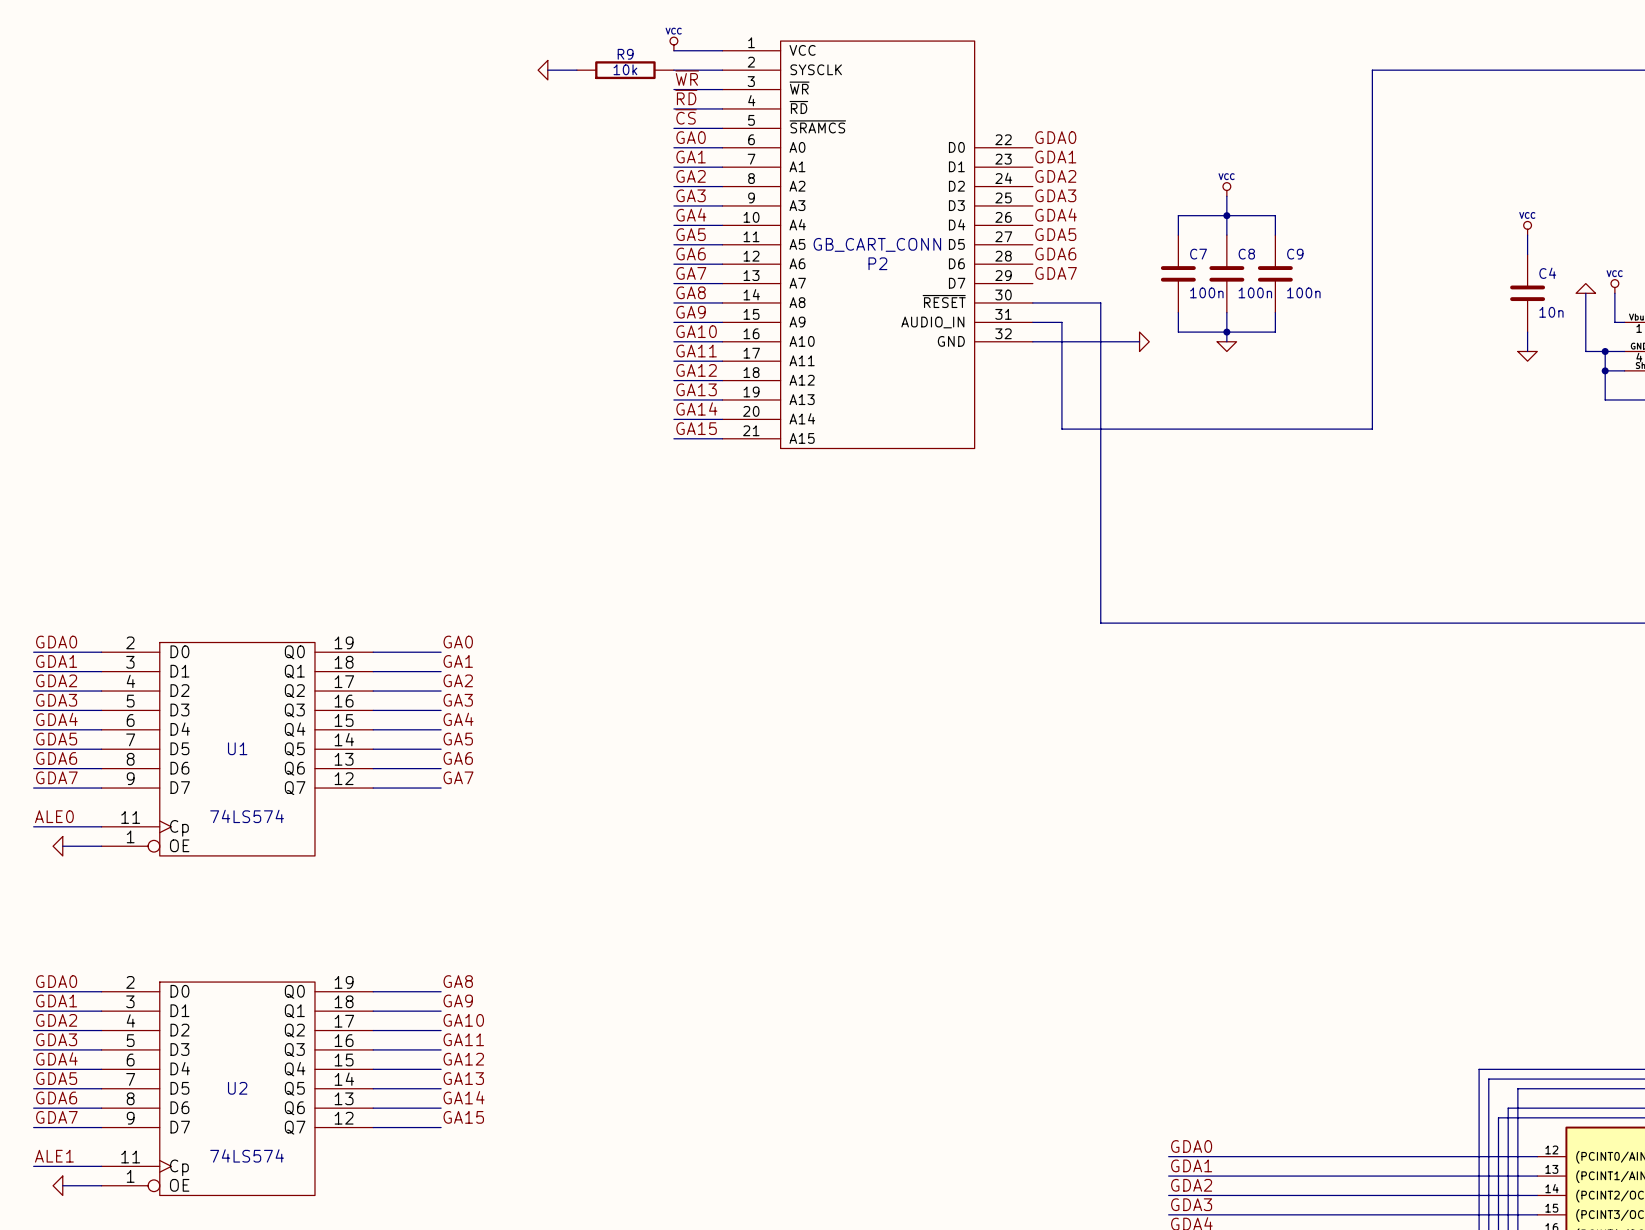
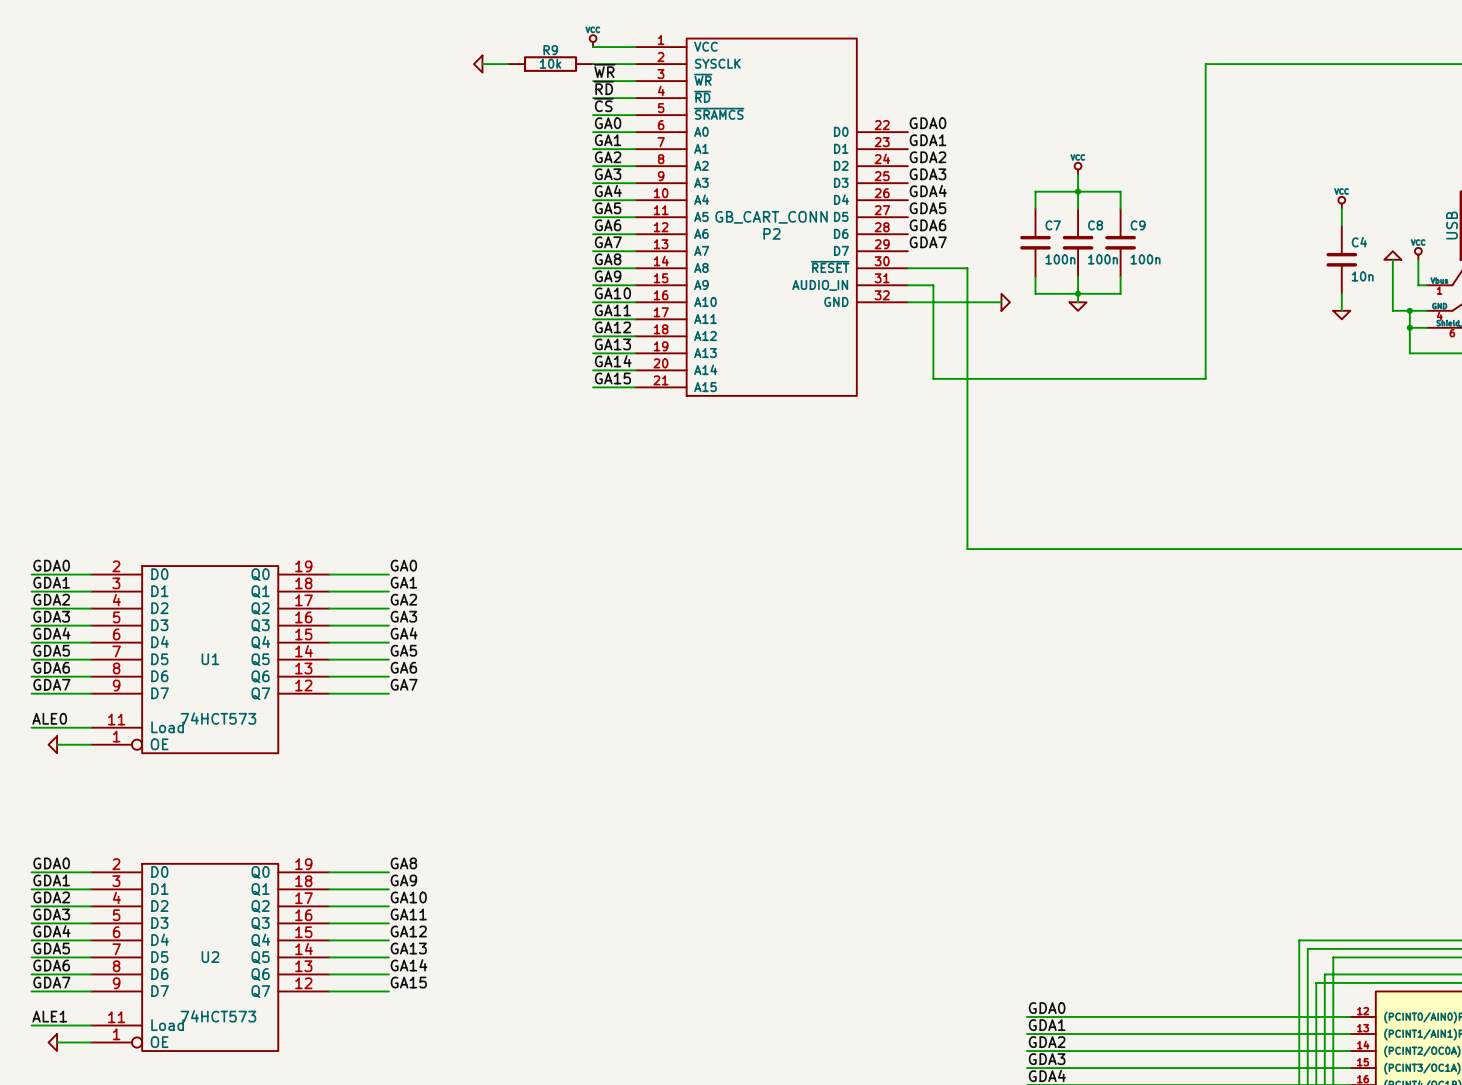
U1 symbol: [101, 642, 374, 856] -> [91, 566, 330, 754]
U1 value: 74LS574 (247, 816) -> 74HCT573 (218, 718)
U2 symbol: [101, 982, 374, 1196] -> [91, 863, 330, 1052]
U2 value: 74LS574 (247, 1155) -> 74HCT573 (218, 1016)

